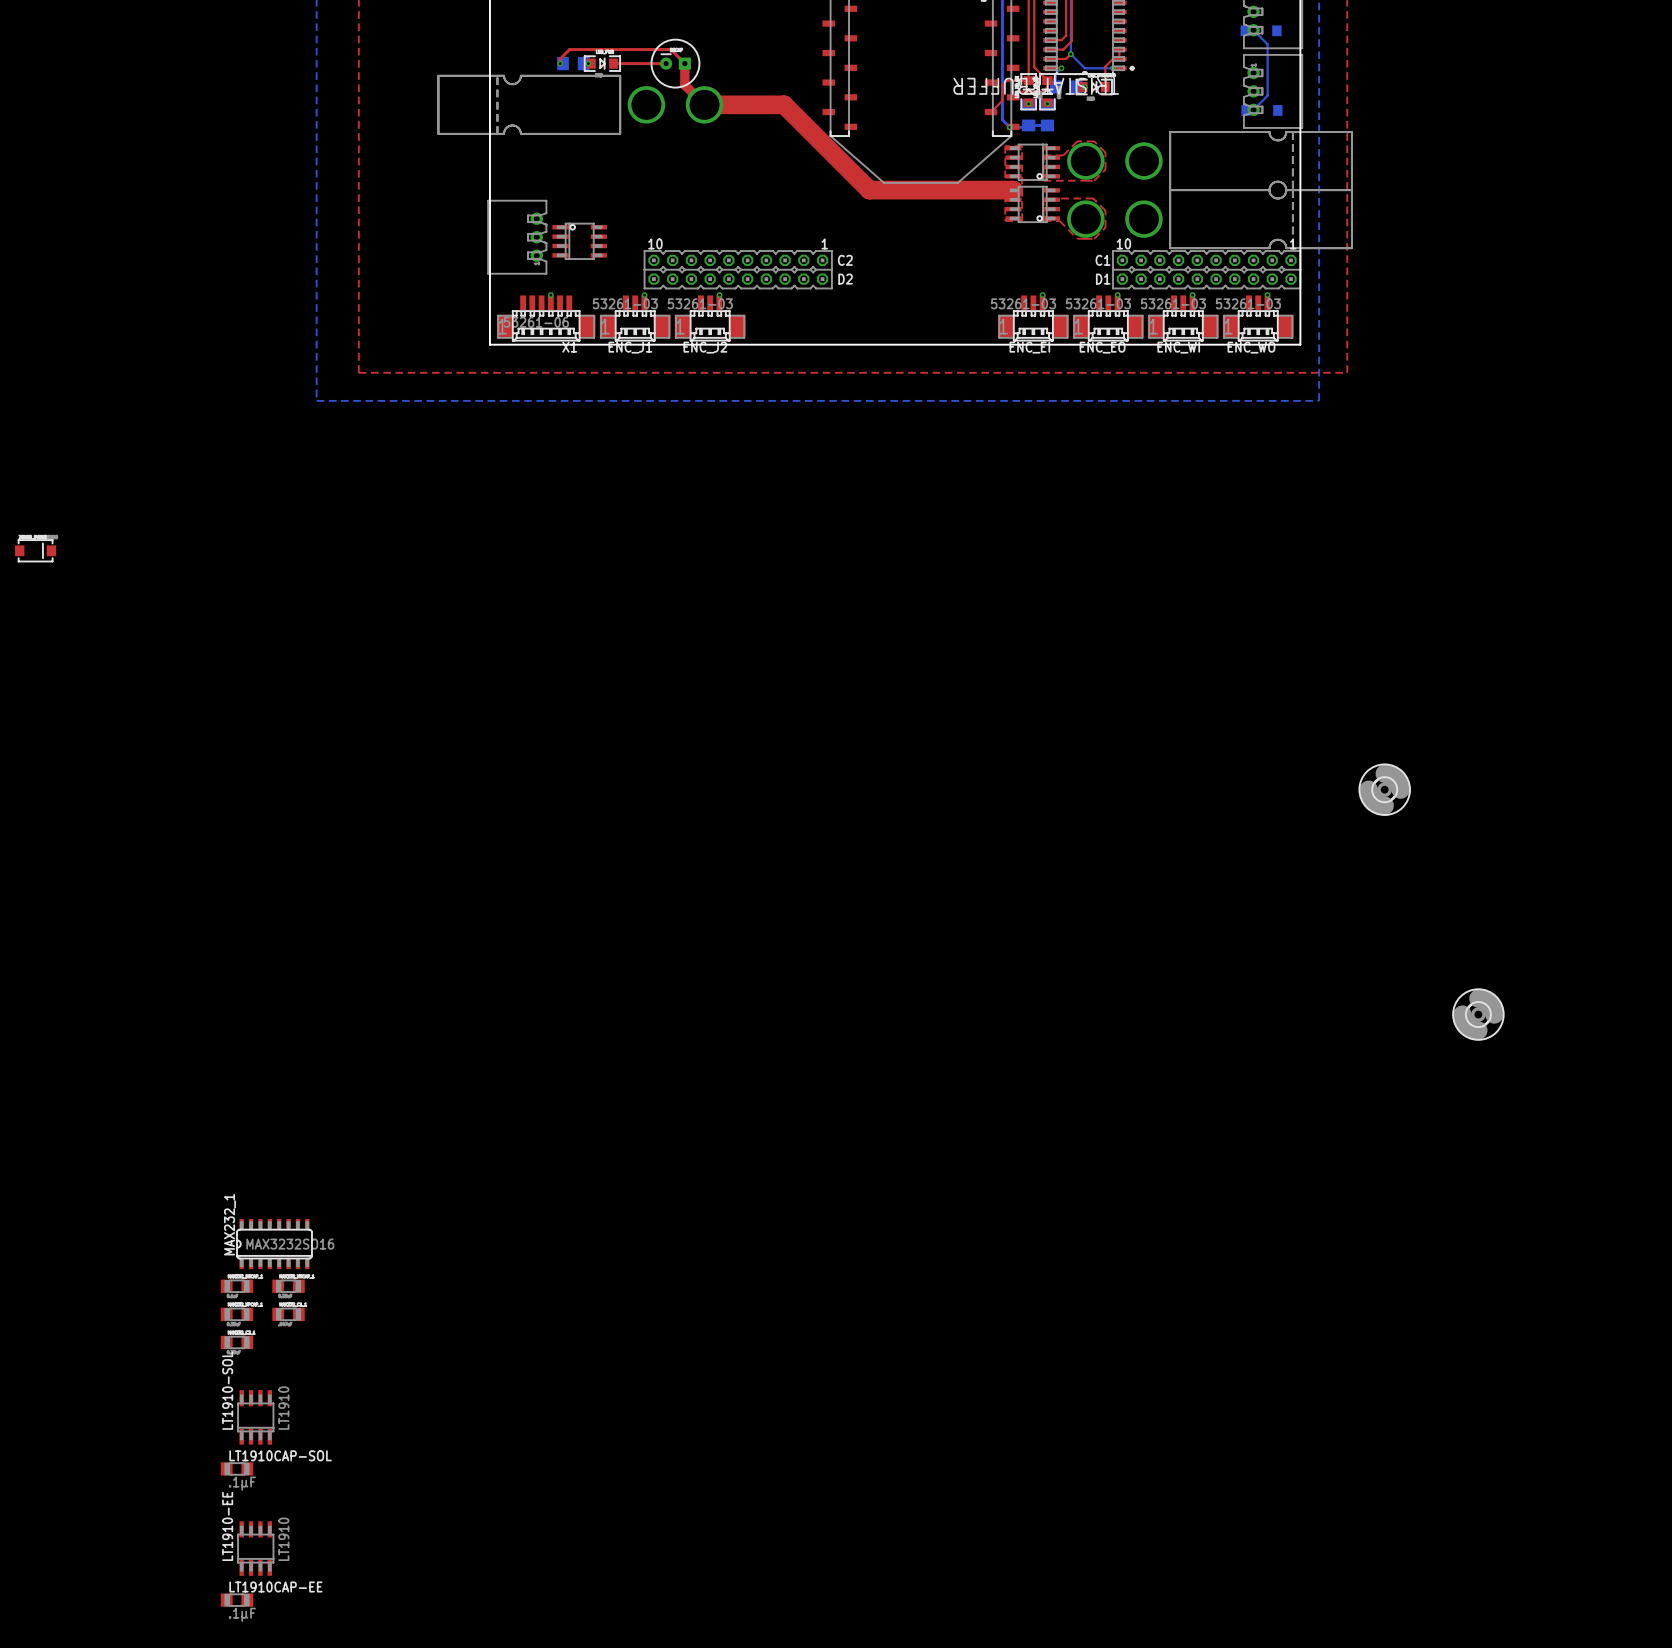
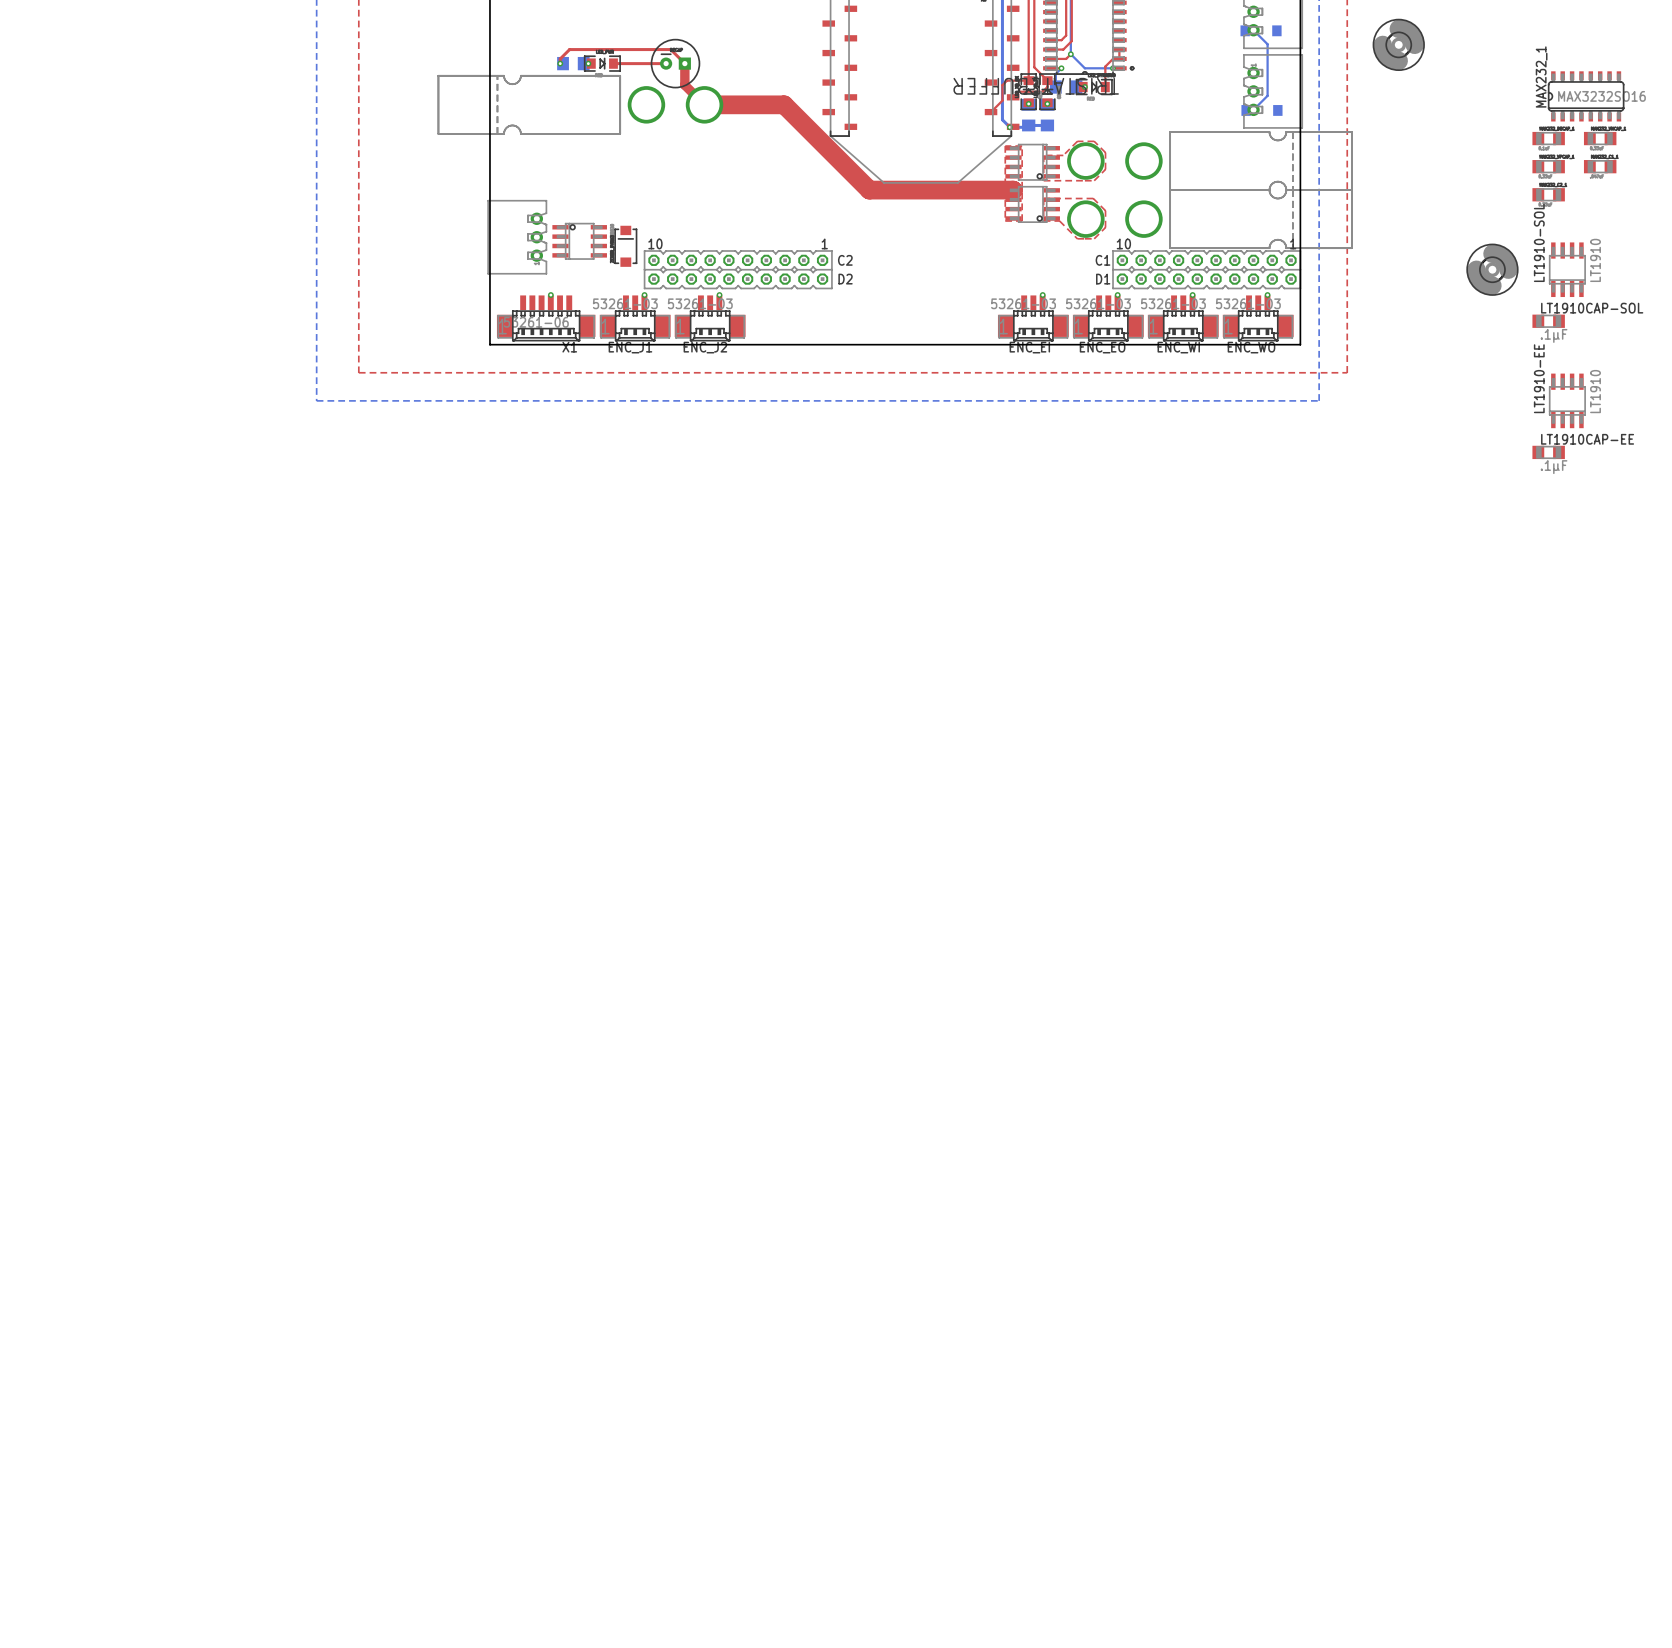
part: none -> (1398, 44)
part: none -> (1492, 269)
part rotation: 0° (35, 550) -> 90° counterclockwise (625, 246)
part position: (35, 550) -> (625, 246)
part: (1384, 789) -> none
part: (1478, 1014) -> none
MAX232_1 position: (274, 1244) -> (1586, 96)
part position: (237, 1286) -> (1548, 138)
part position: (288, 1286) -> (1600, 138)
part position: (237, 1314) -> (1548, 166)
part position: (288, 1314) -> (1600, 166)
part position: (237, 1342) -> (1548, 194)
LT1910-SOL position: (255, 1417) -> (1567, 269)
LT1910CAP-SOL position: (237, 1468) -> (1548, 321)
LT1910-EE position: (255, 1548) -> (1567, 400)
LT1910CAP-EE position: (237, 1600) -> (1548, 452)

